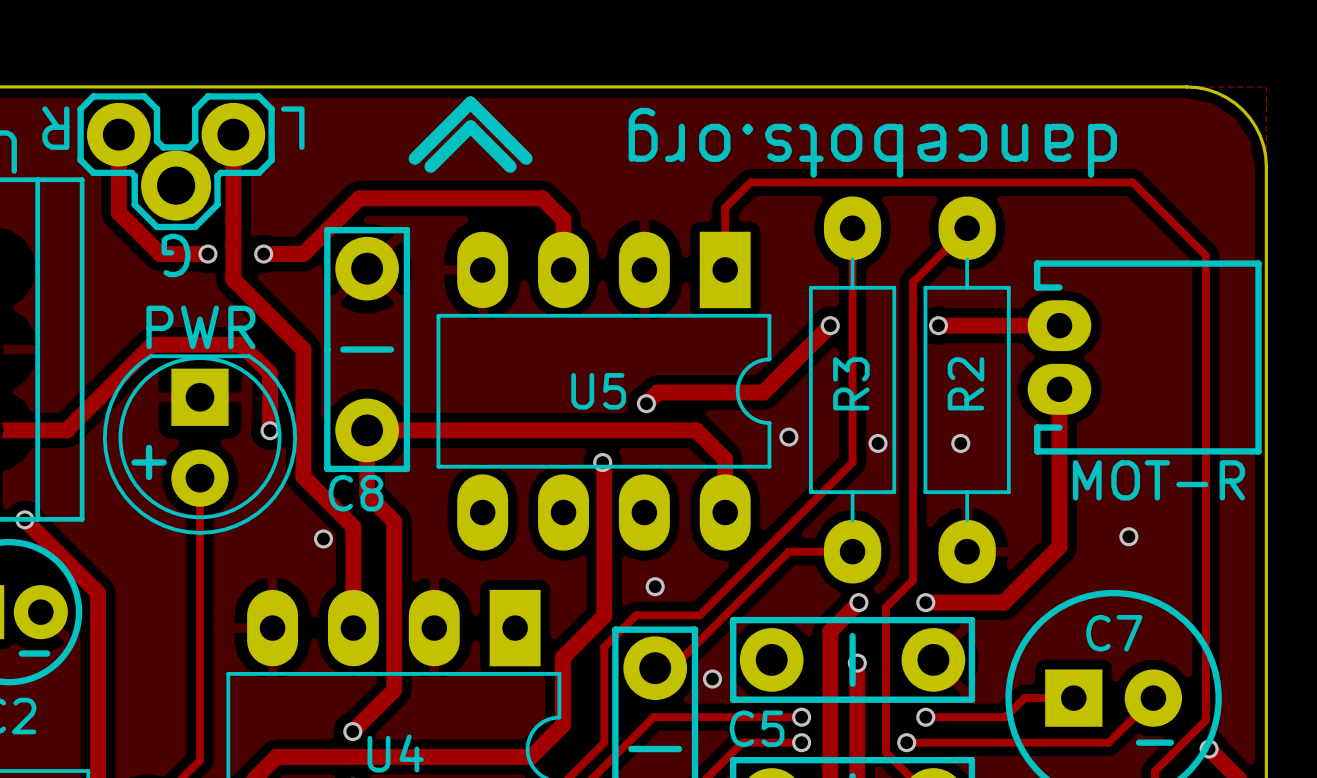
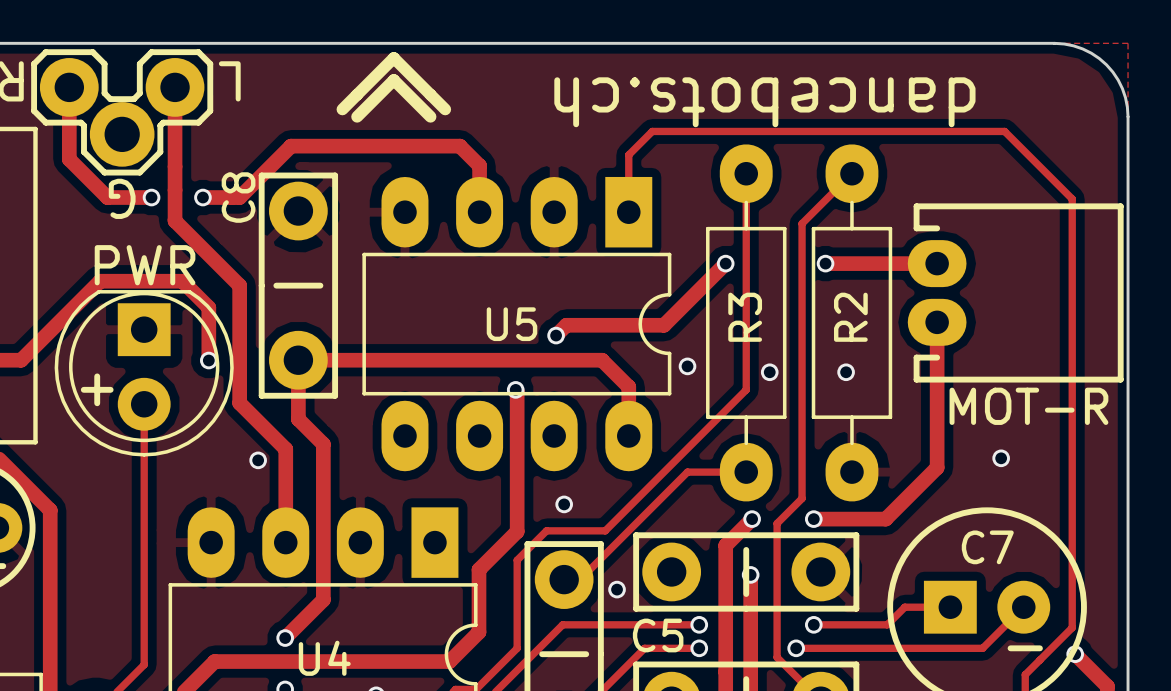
text: dancebots.org (872, 142) -> dancebots.ch (764, 102)
C8 name rotation: 0° (355, 493) -> 90° counterclockwise (238, 197)
C8 name position: C8 (355, 493) -> C8 (238, 197)

